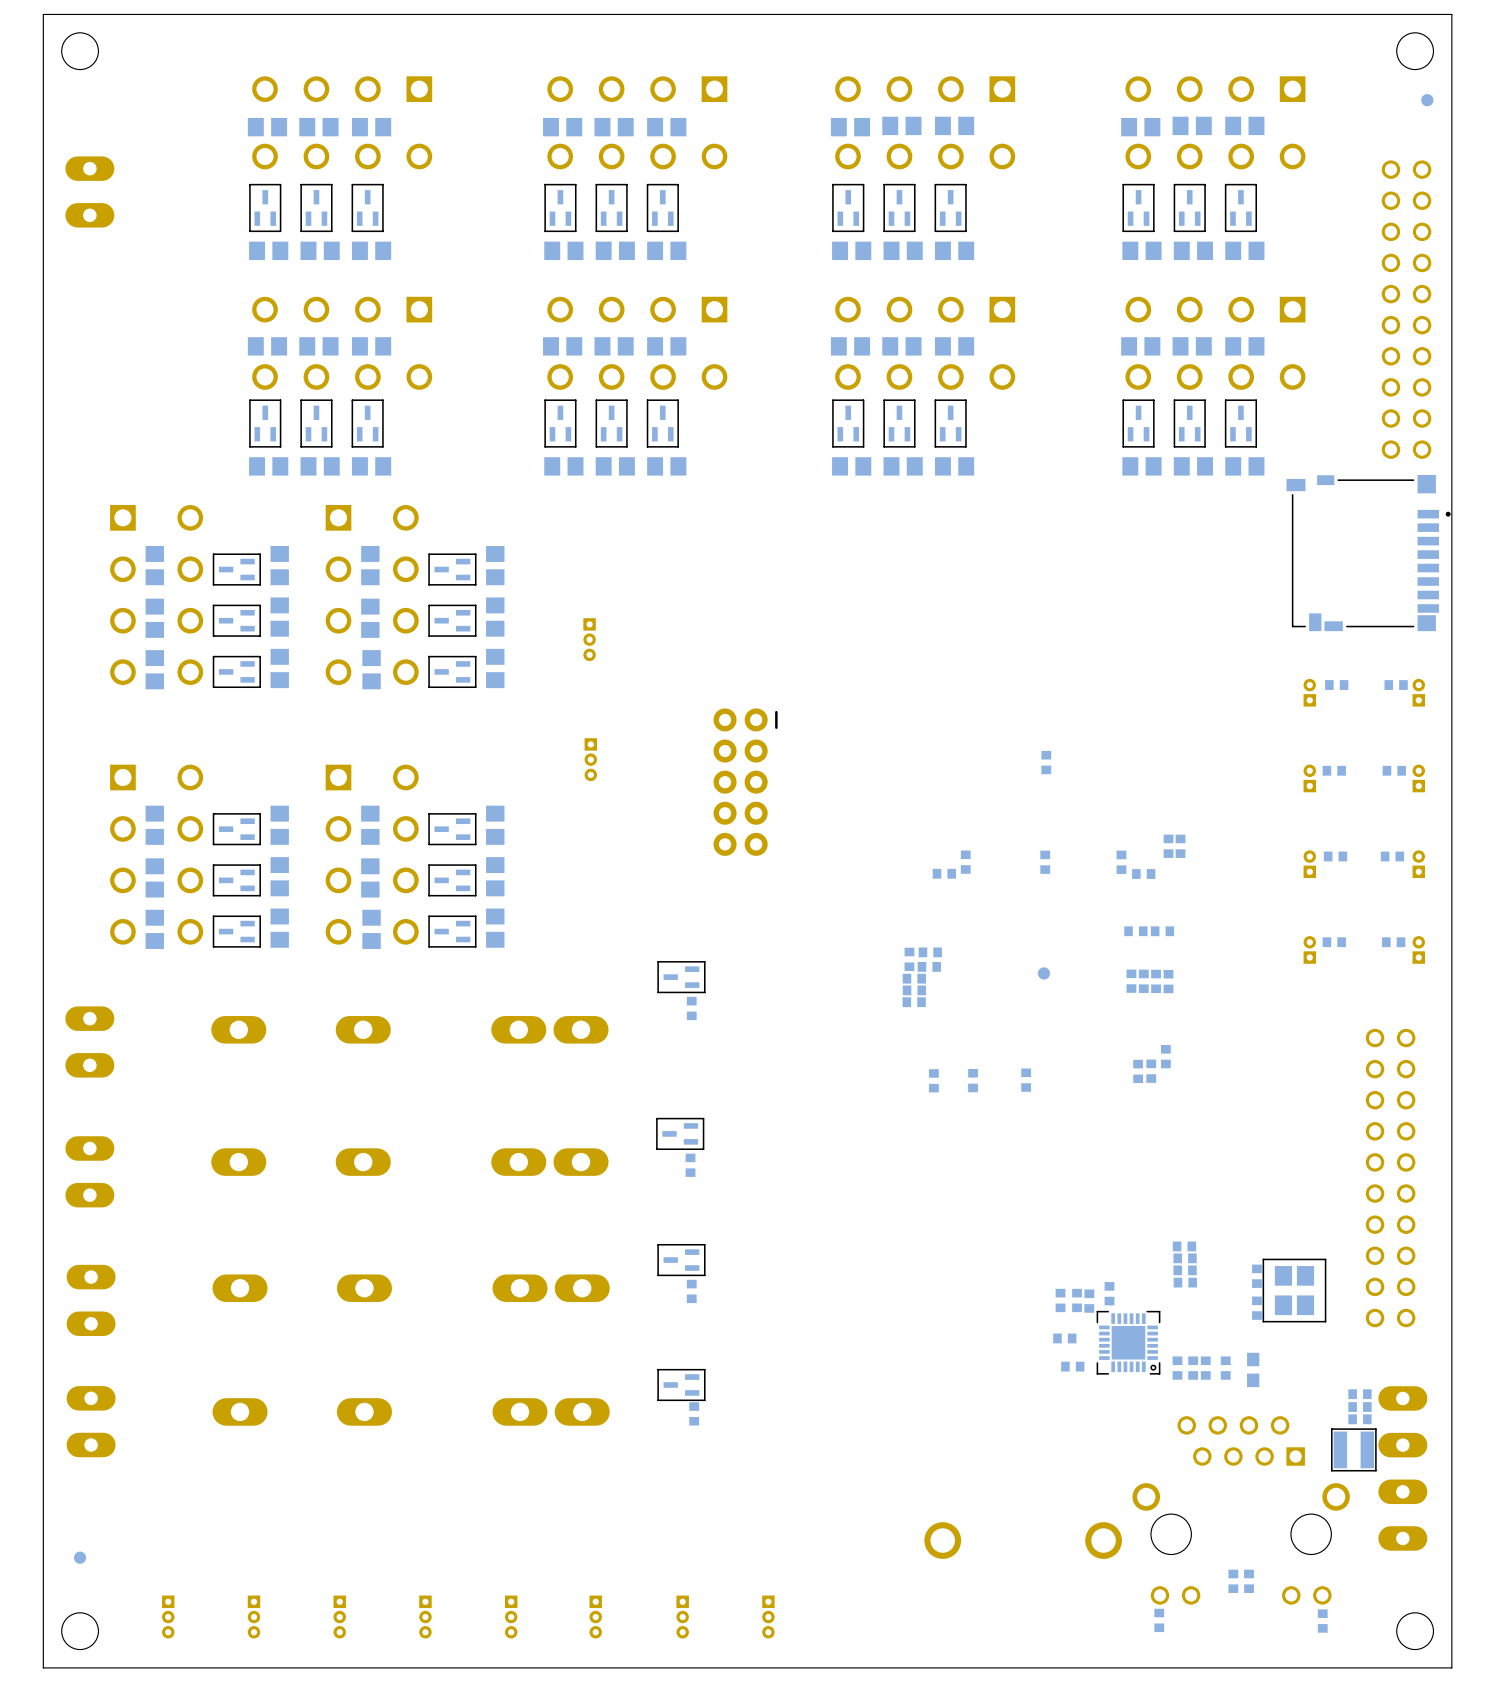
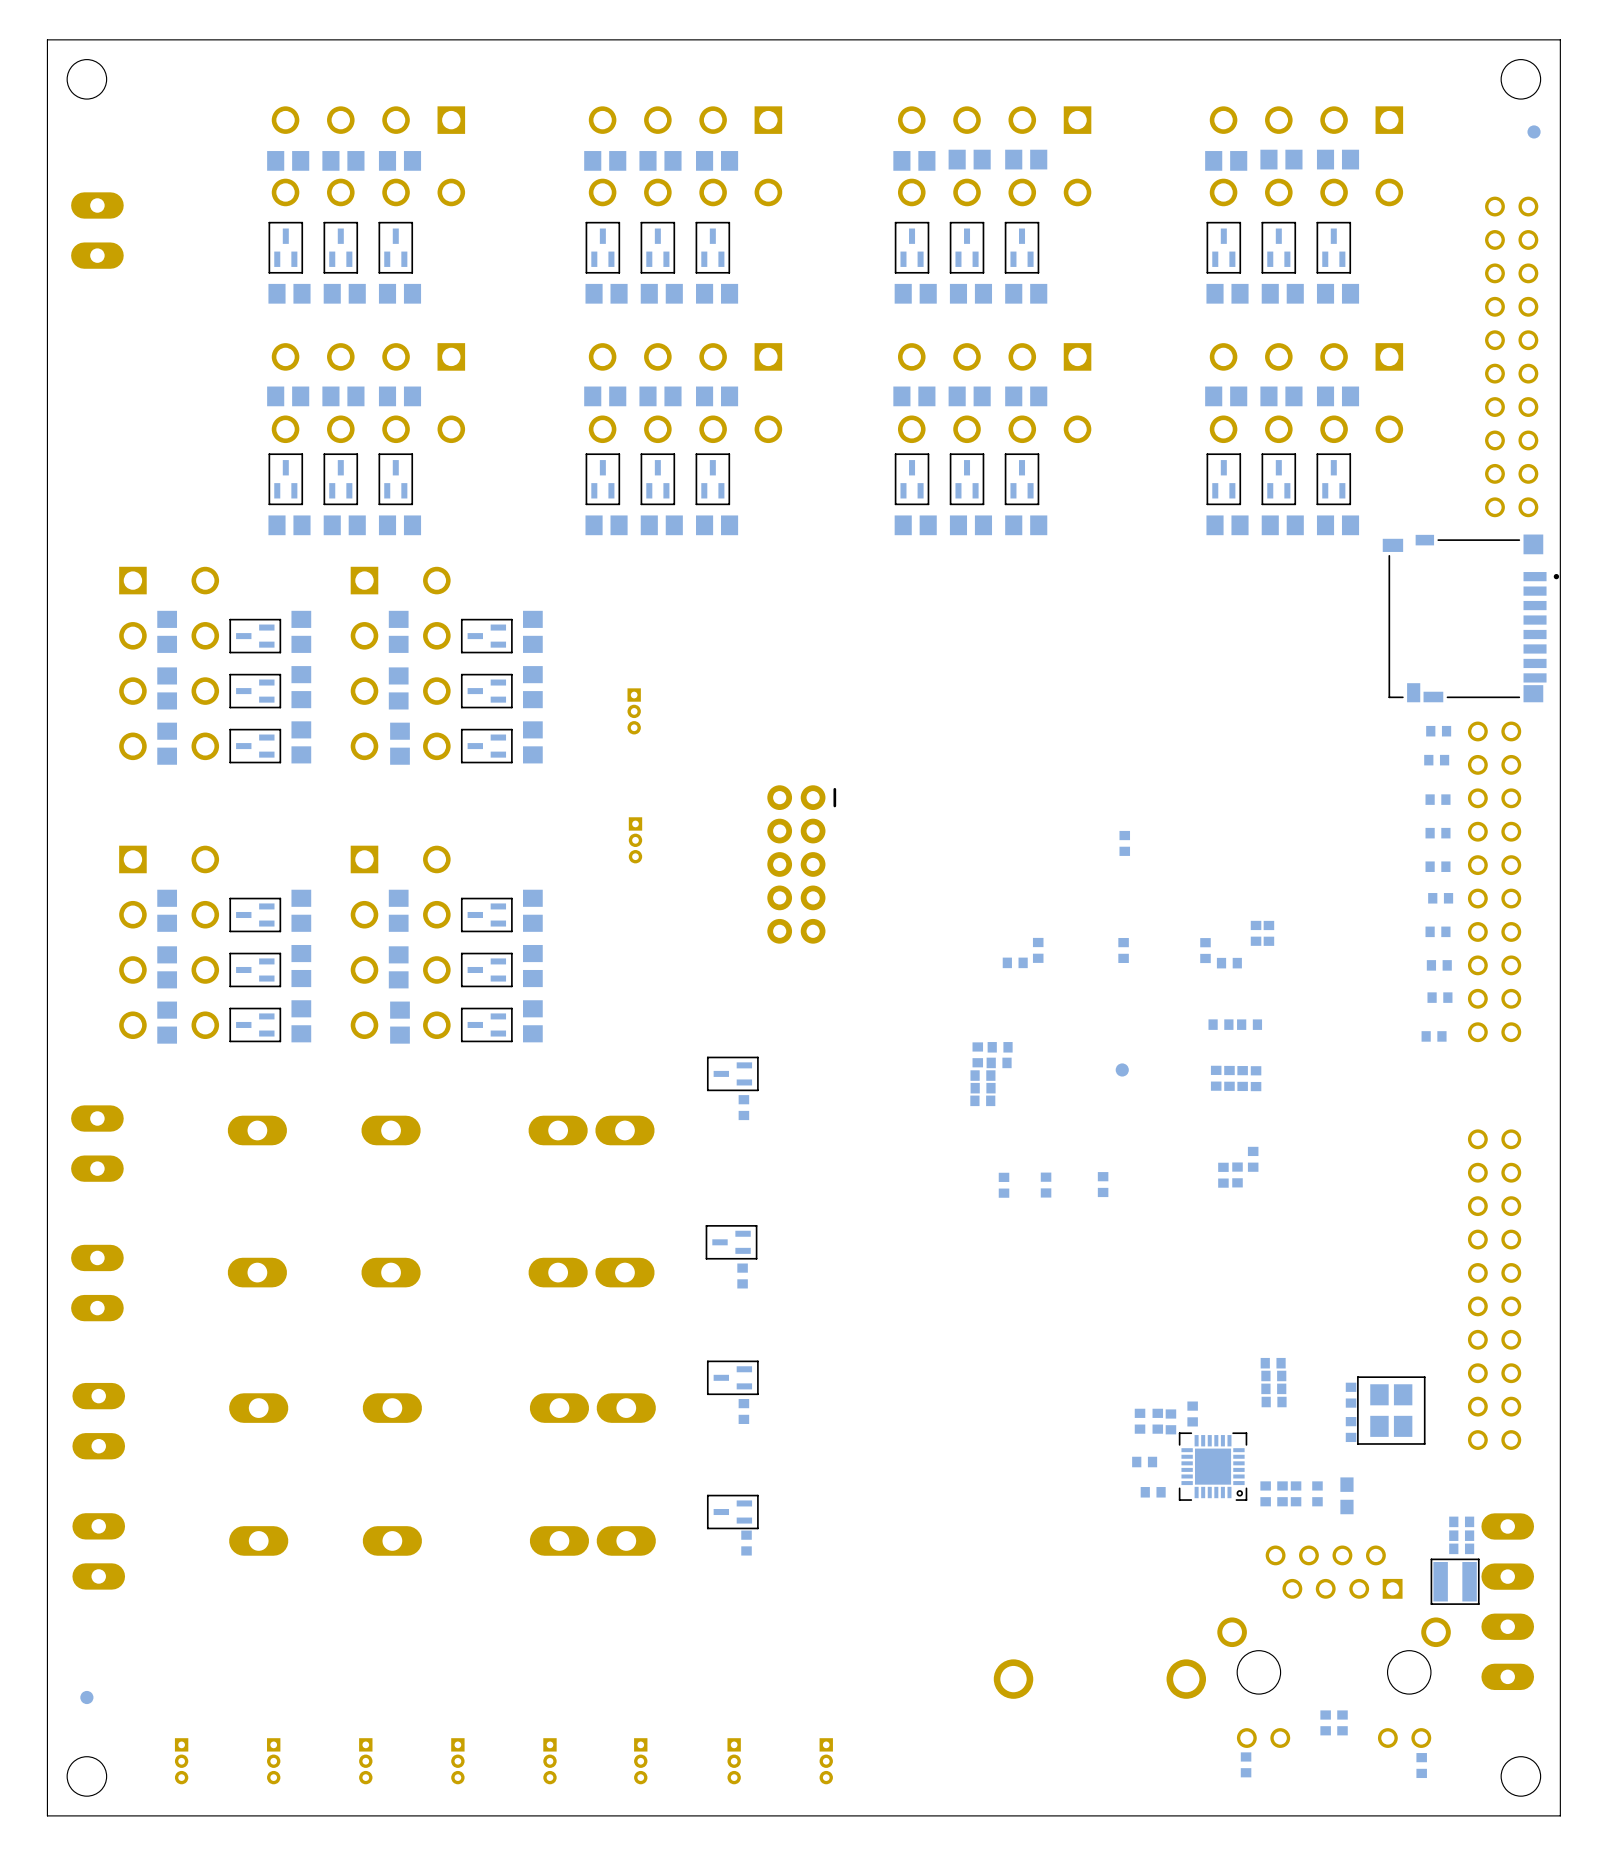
part: none -> (1438, 731)
part: (1396, 685) -> none
part: (1309, 692) -> none
part: (1418, 692) -> none
part: none -> (1438, 799)
part: none -> (1438, 833)
part: (1334, 770) -> none
part: (1394, 770) -> none
part: (1309, 778) -> none
part: (1418, 778) -> none
part: none -> (1438, 866)
part: none -> (1494, 881)
part: none -> (1440, 898)
part: none -> (1438, 931)
part: (1335, 856) -> none
part: (1392, 856) -> none
part: (1309, 864) -> none
part: (1418, 864) -> none
part: none -> (1439, 965)
part: none -> (1439, 997)
part: (1393, 942) -> none
part: (1309, 949) -> none
part: (1418, 949) -> none

